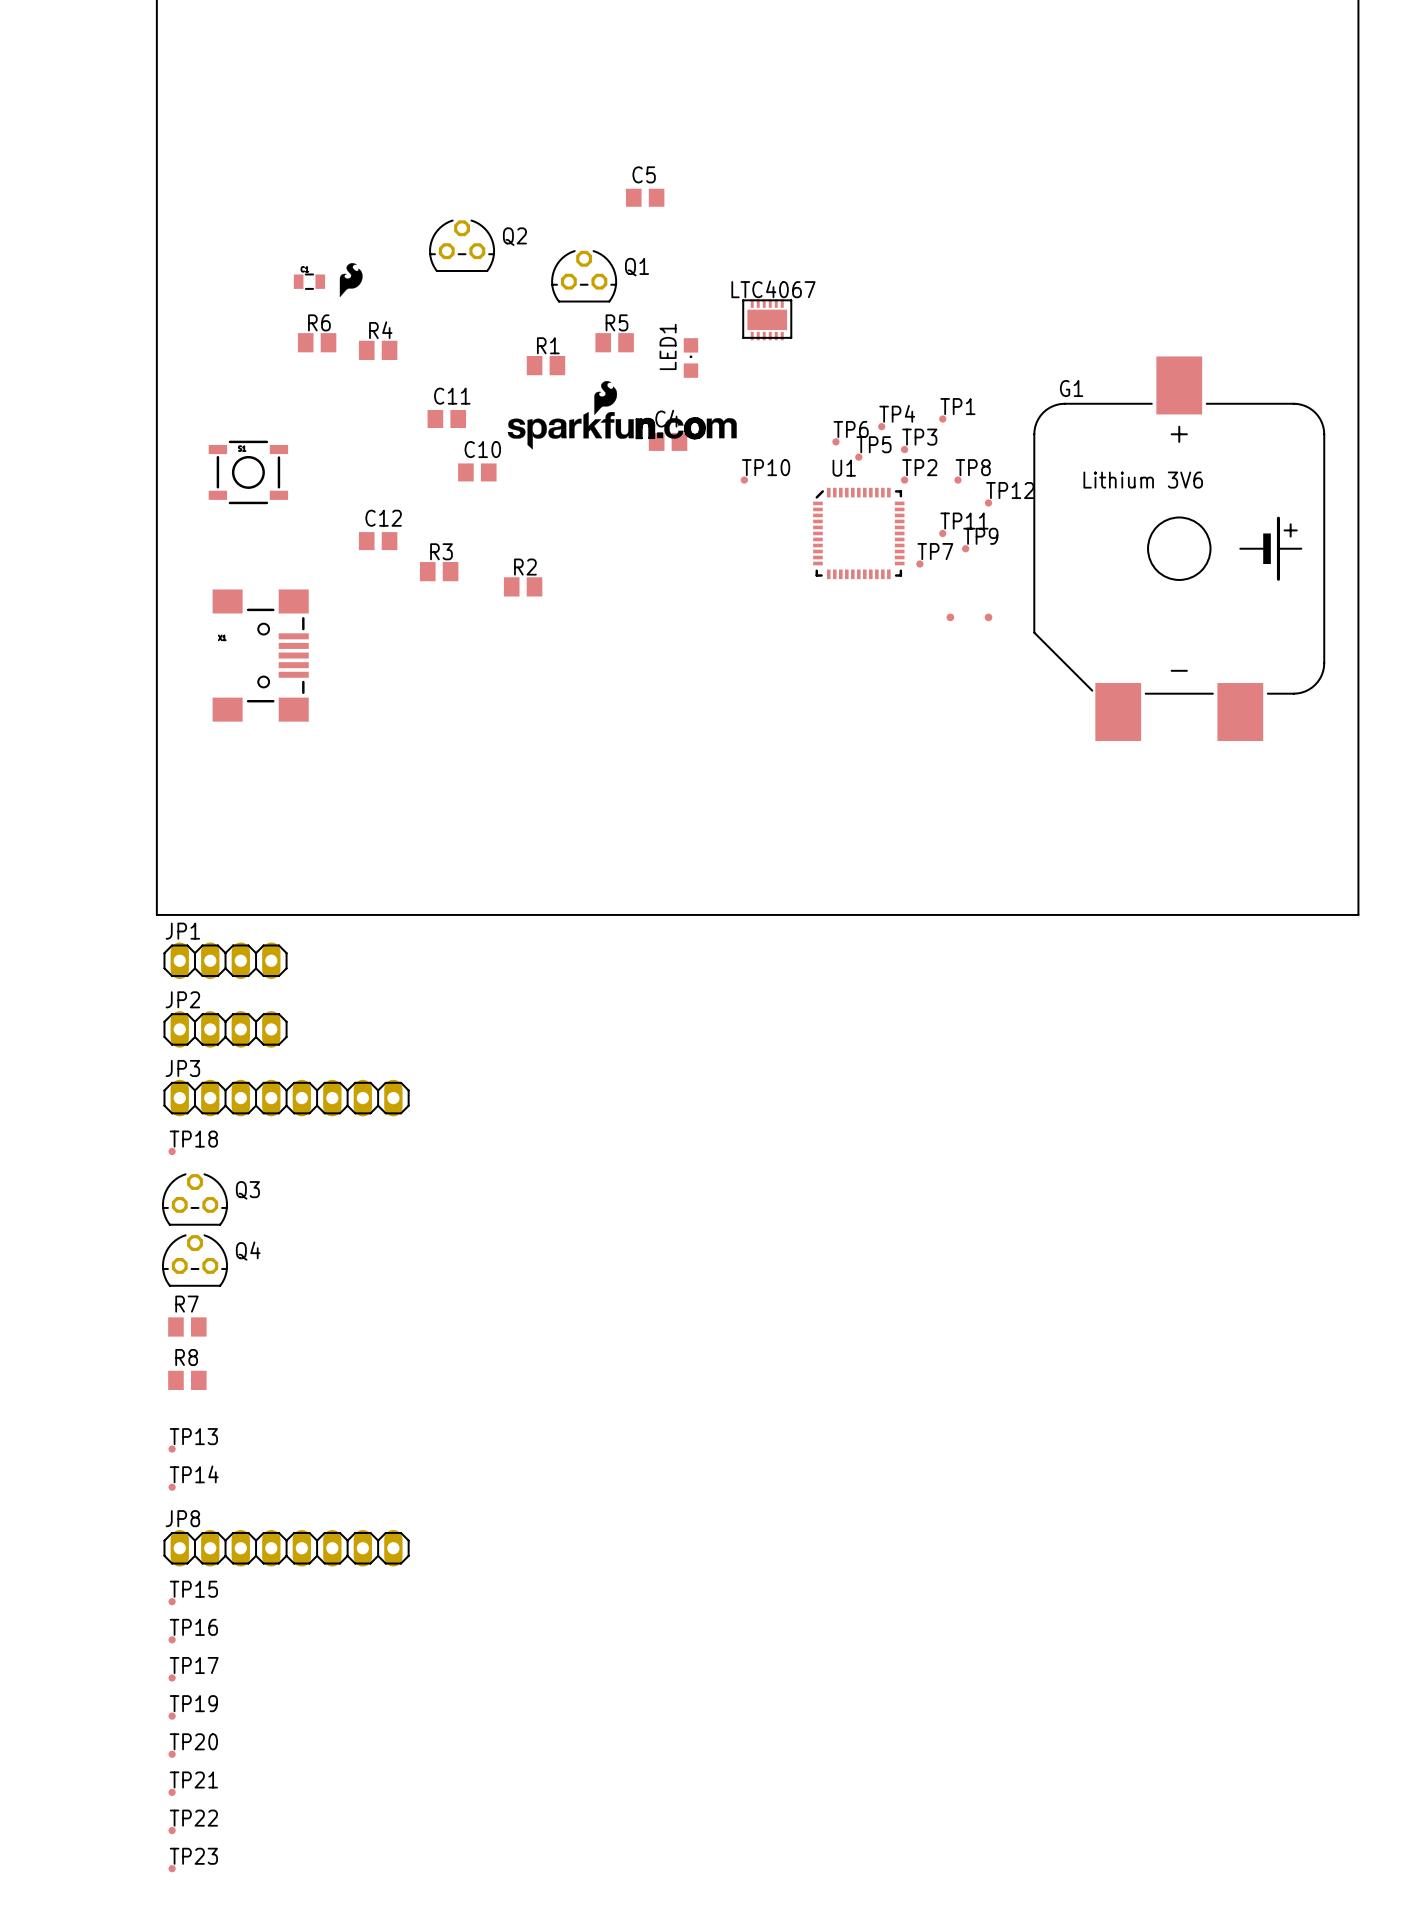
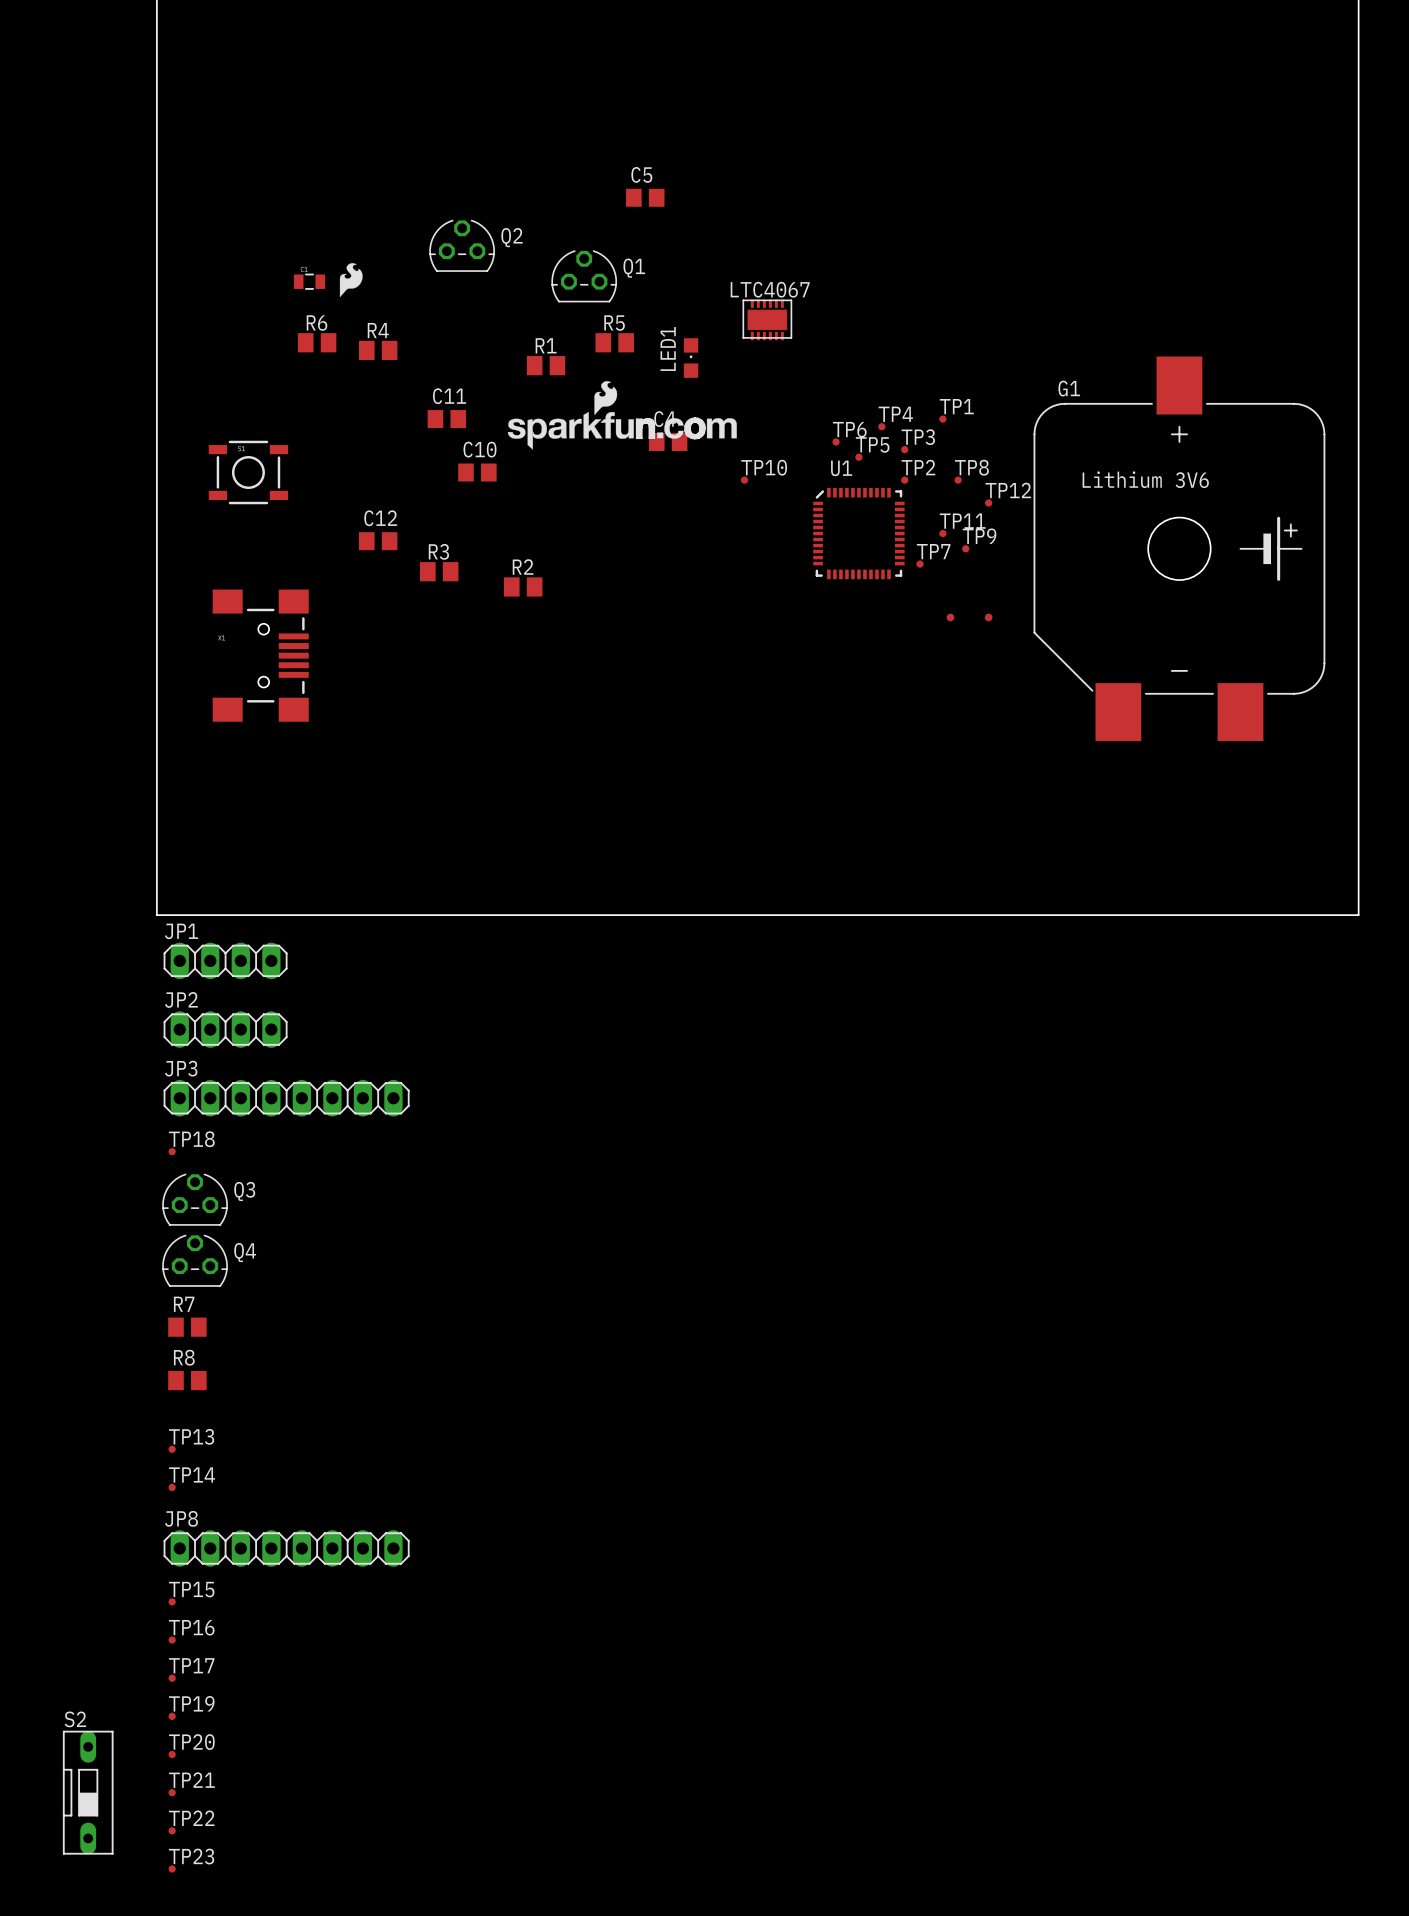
S2: none -> (88, 1792)

